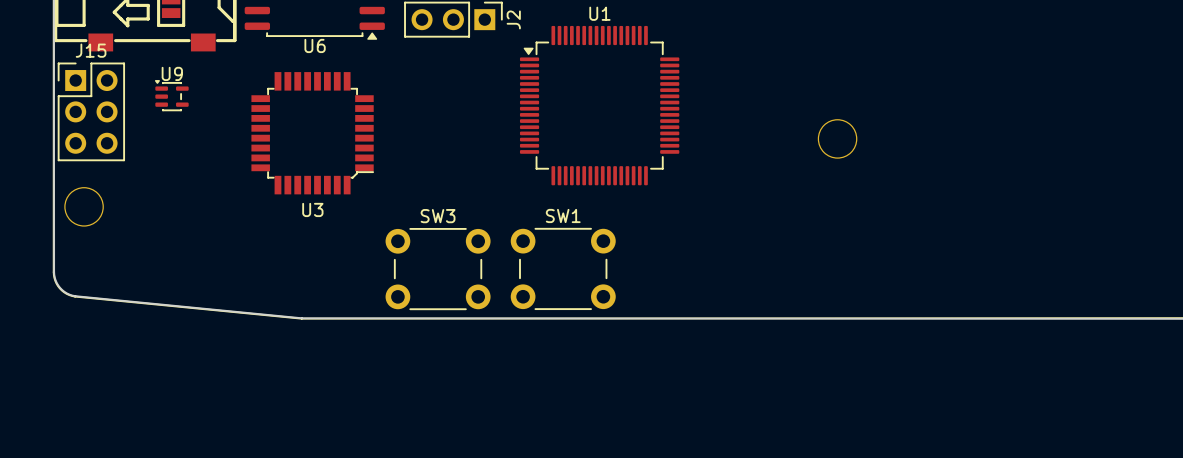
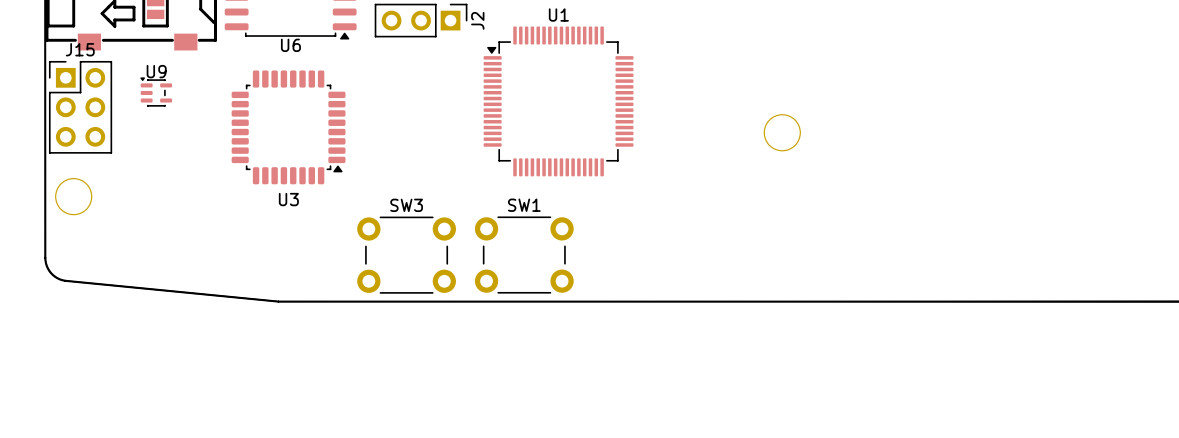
U3 footprint: [251, 72, 374, 195] -> [231, 70, 346, 185]

